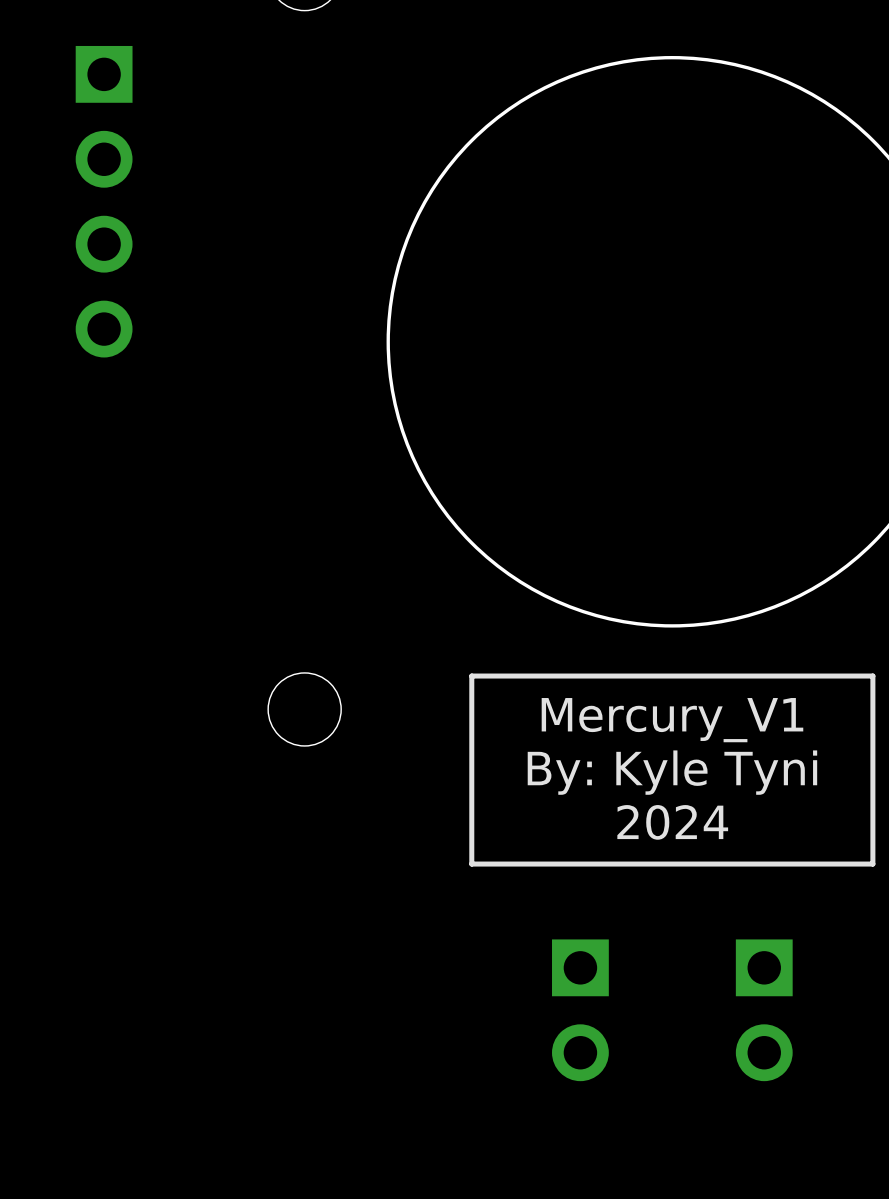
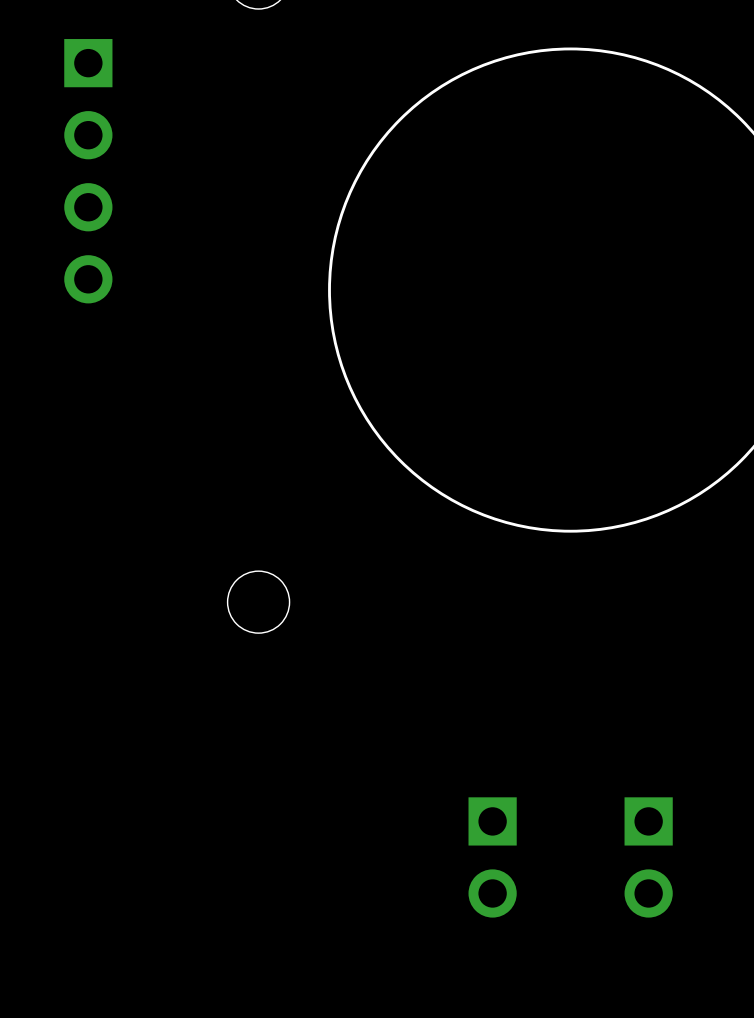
line: (872, 676) (471, 676) (471, 864) (872, 864) (872, 676) -> none
text: Mercury_V1 (672, 720) -> none
text: By: Kyle Tyni (672, 772) -> none
text: 2024 (672, 822) -> none

